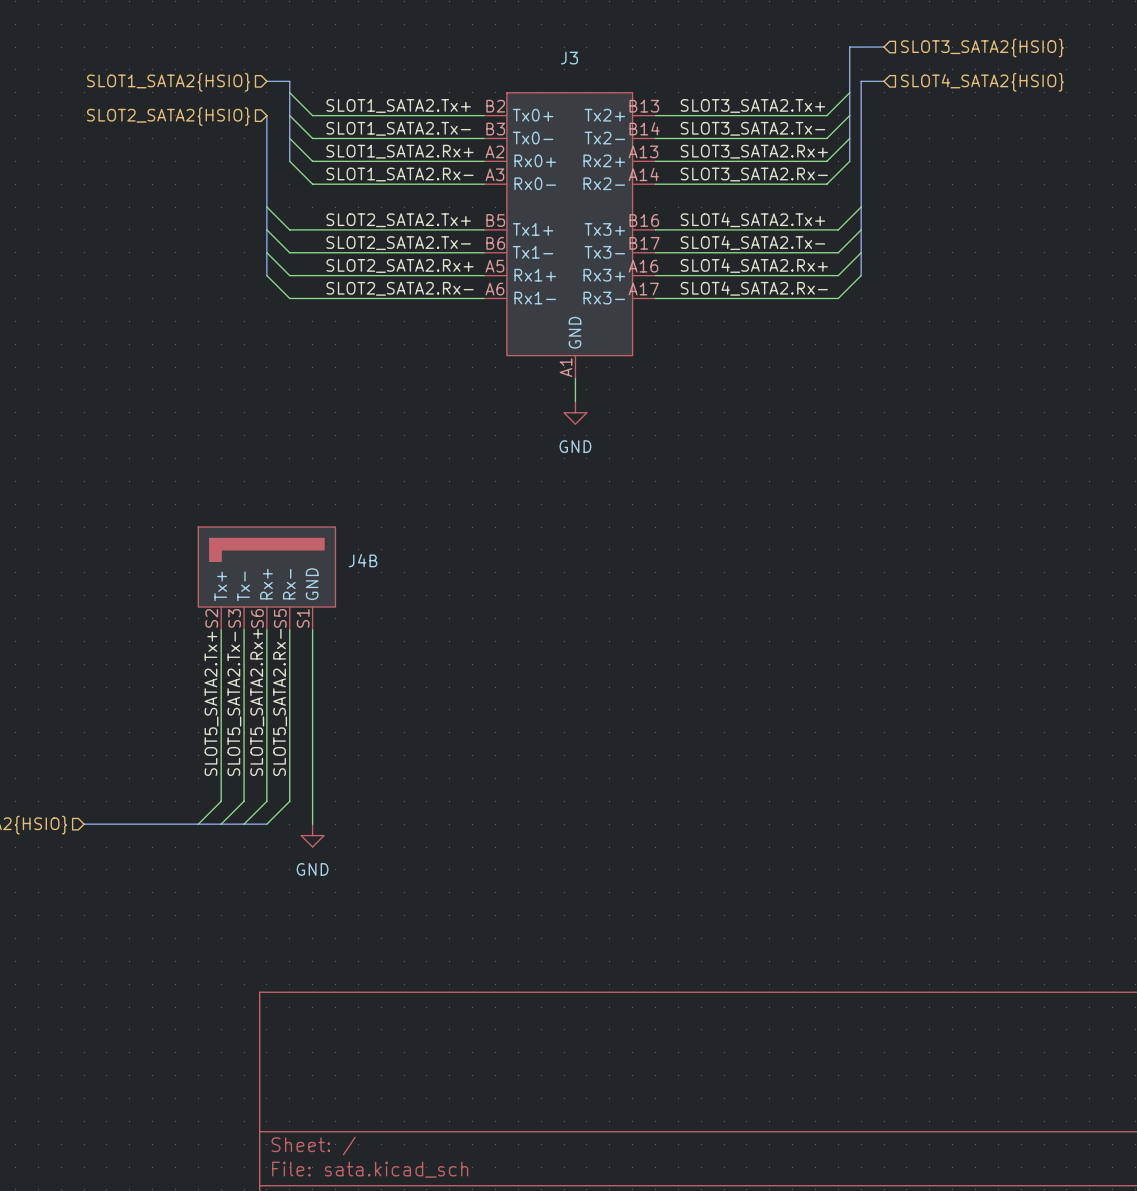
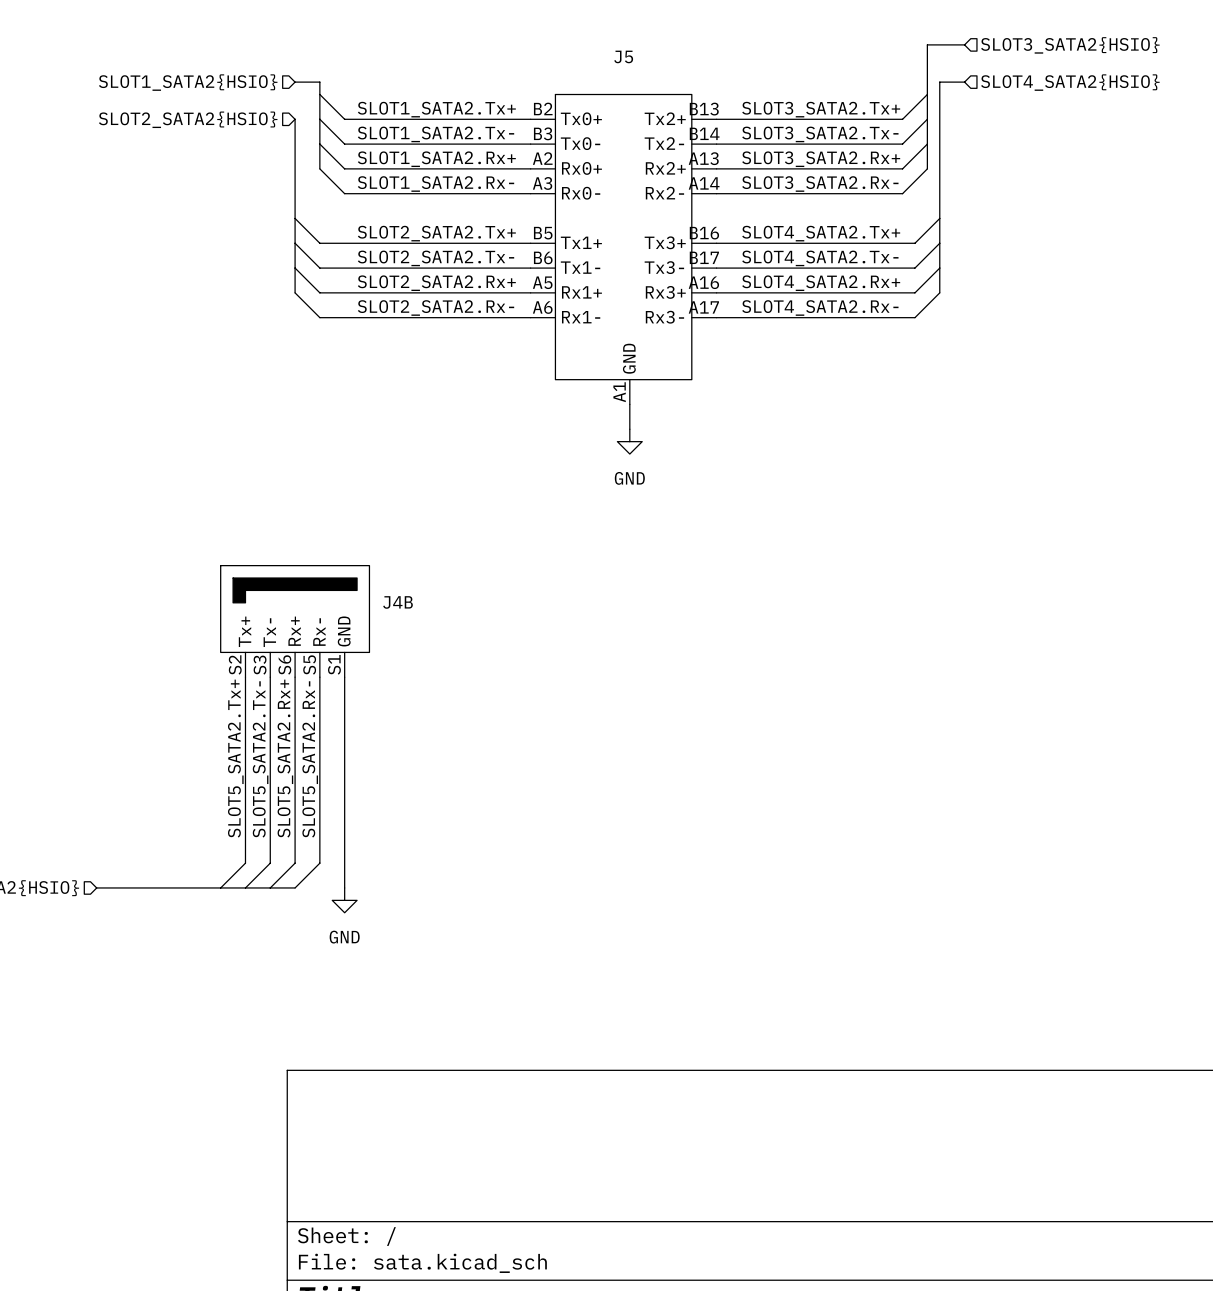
J3 name: J3 (569, 58) -> J5 (623, 56)

